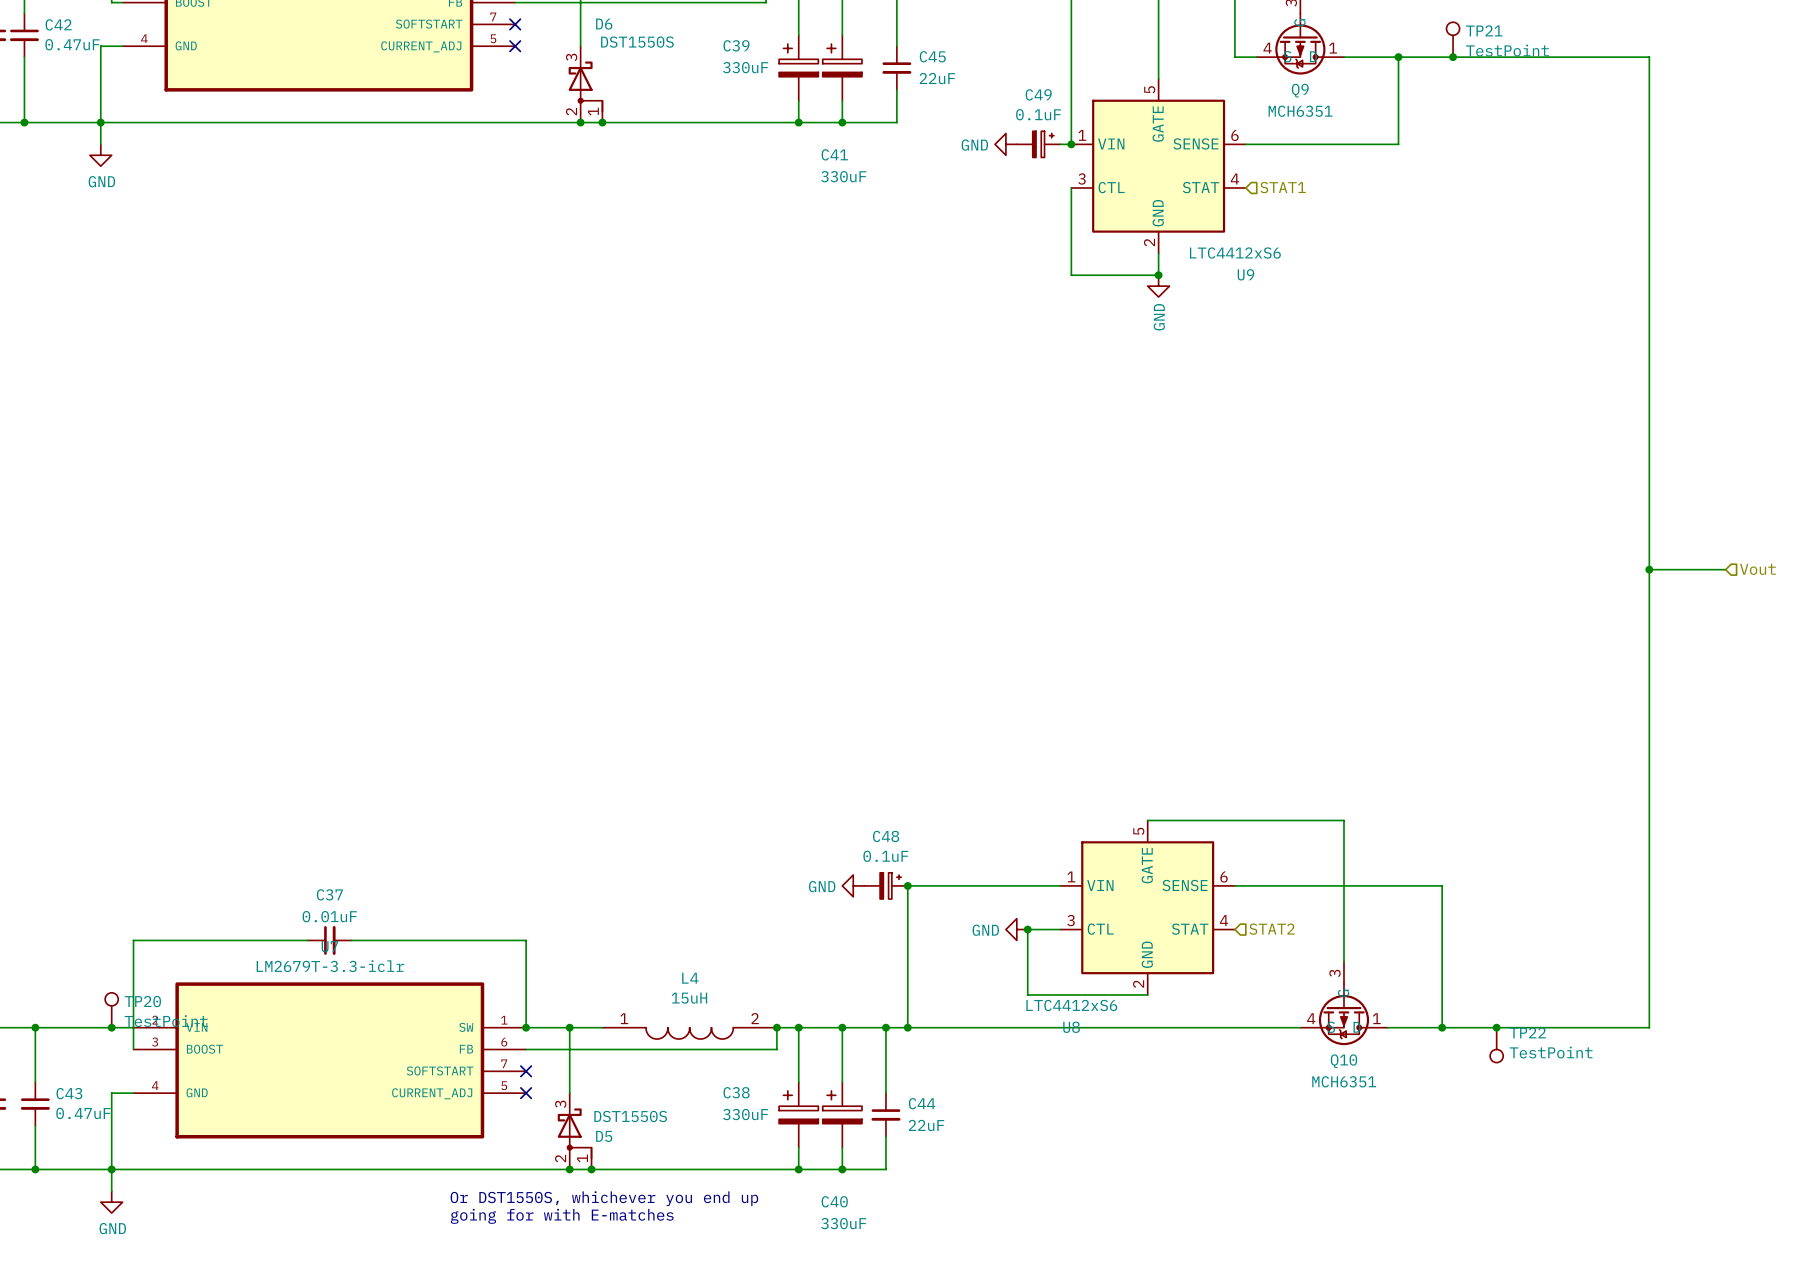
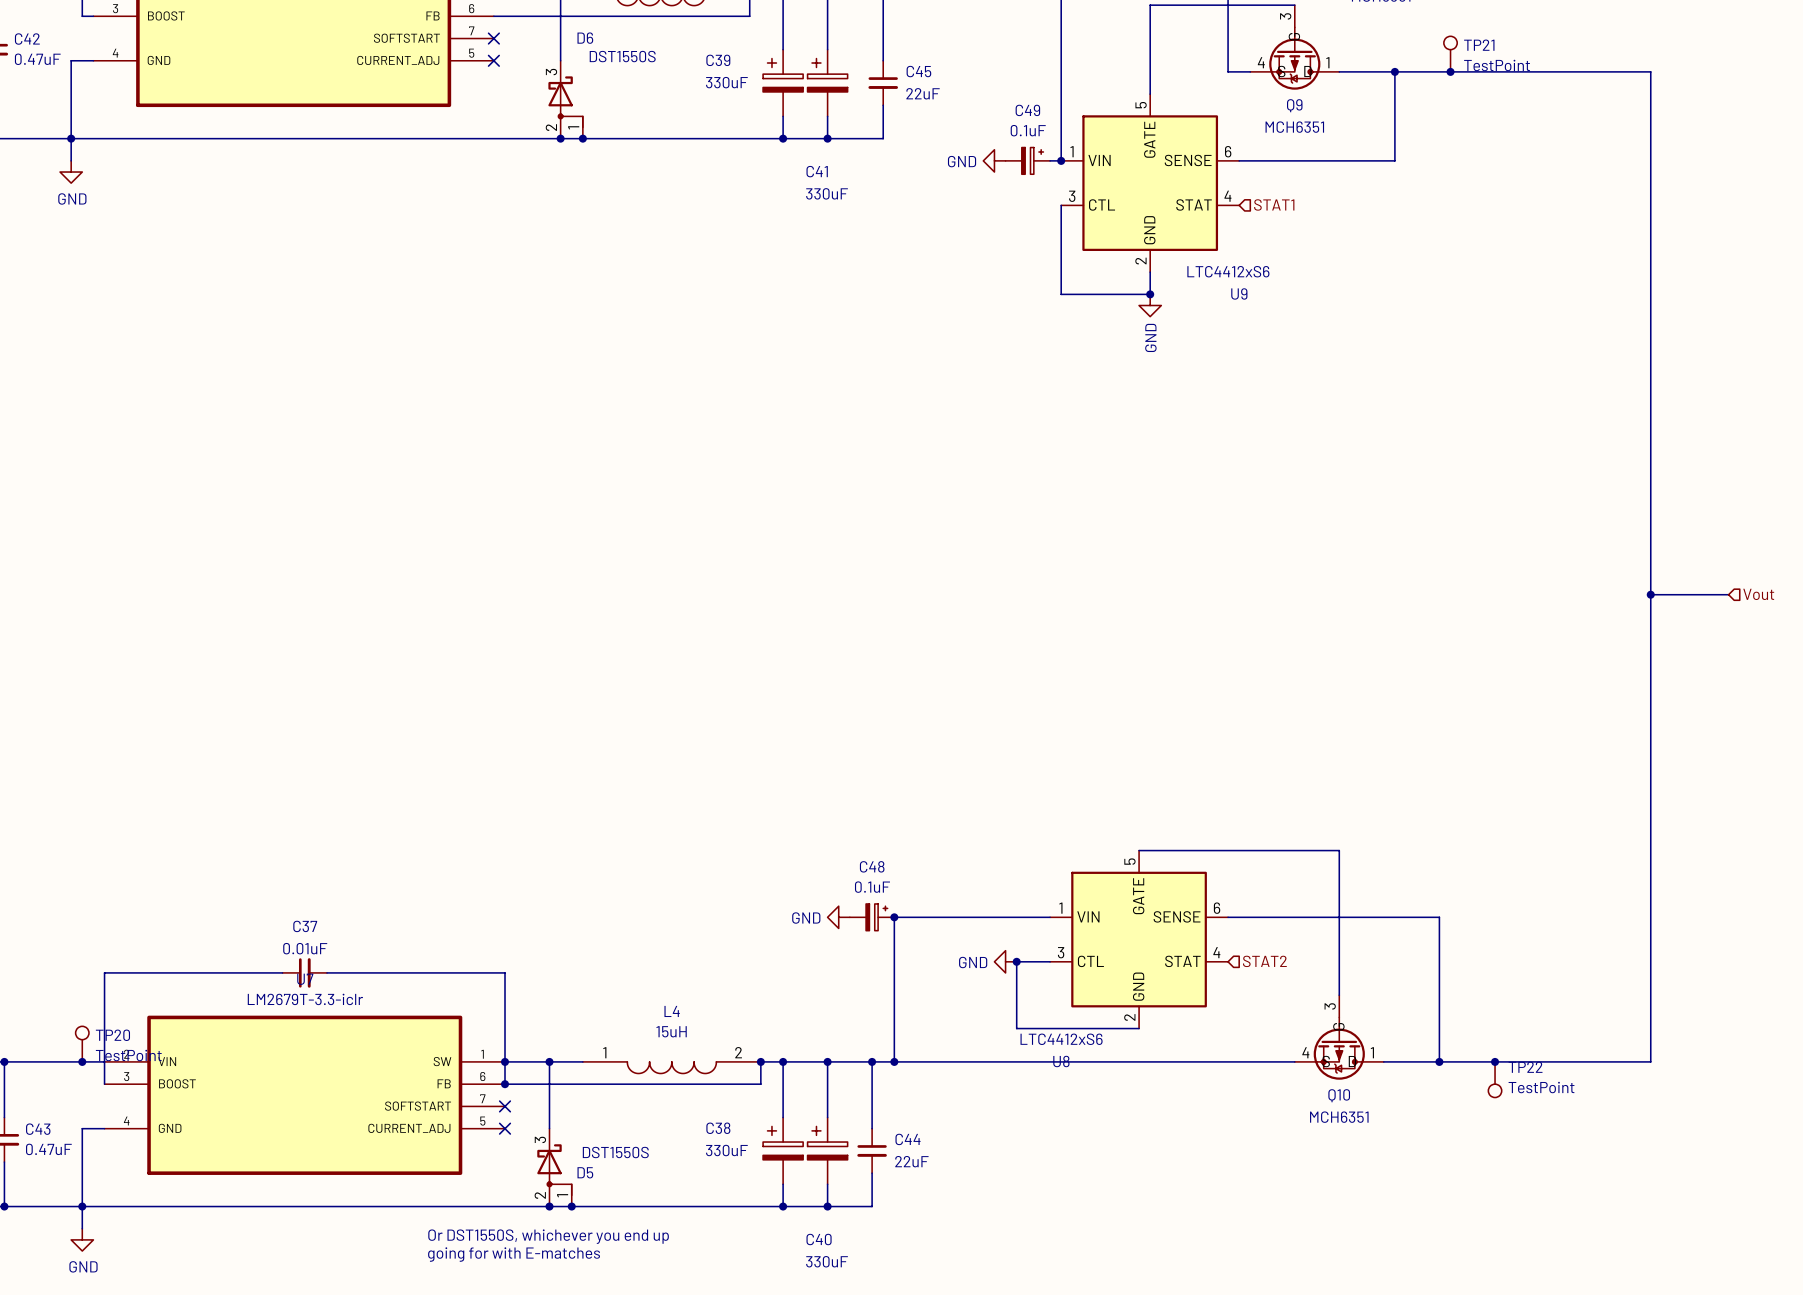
wire: none -> (505, 1061) (505, 1084)
junction: none -> (505, 1084)

